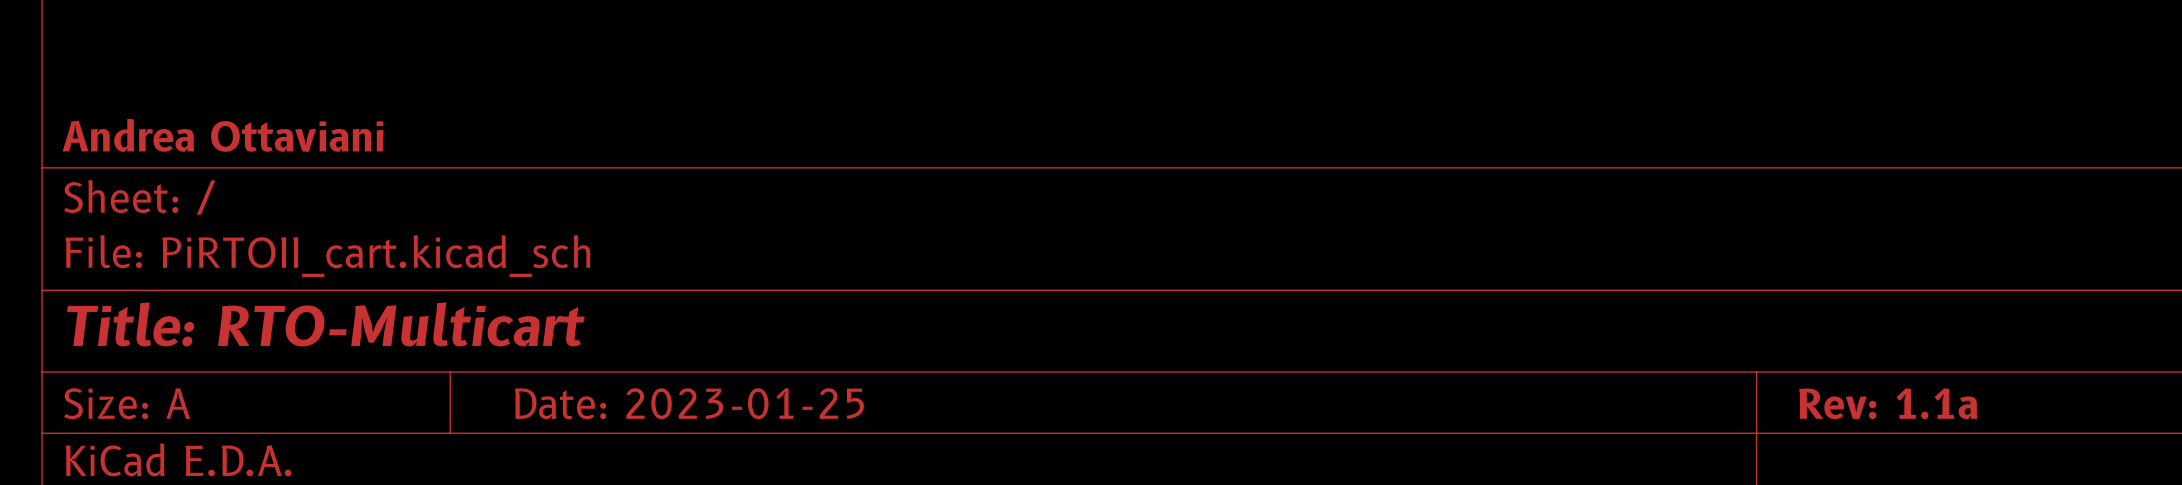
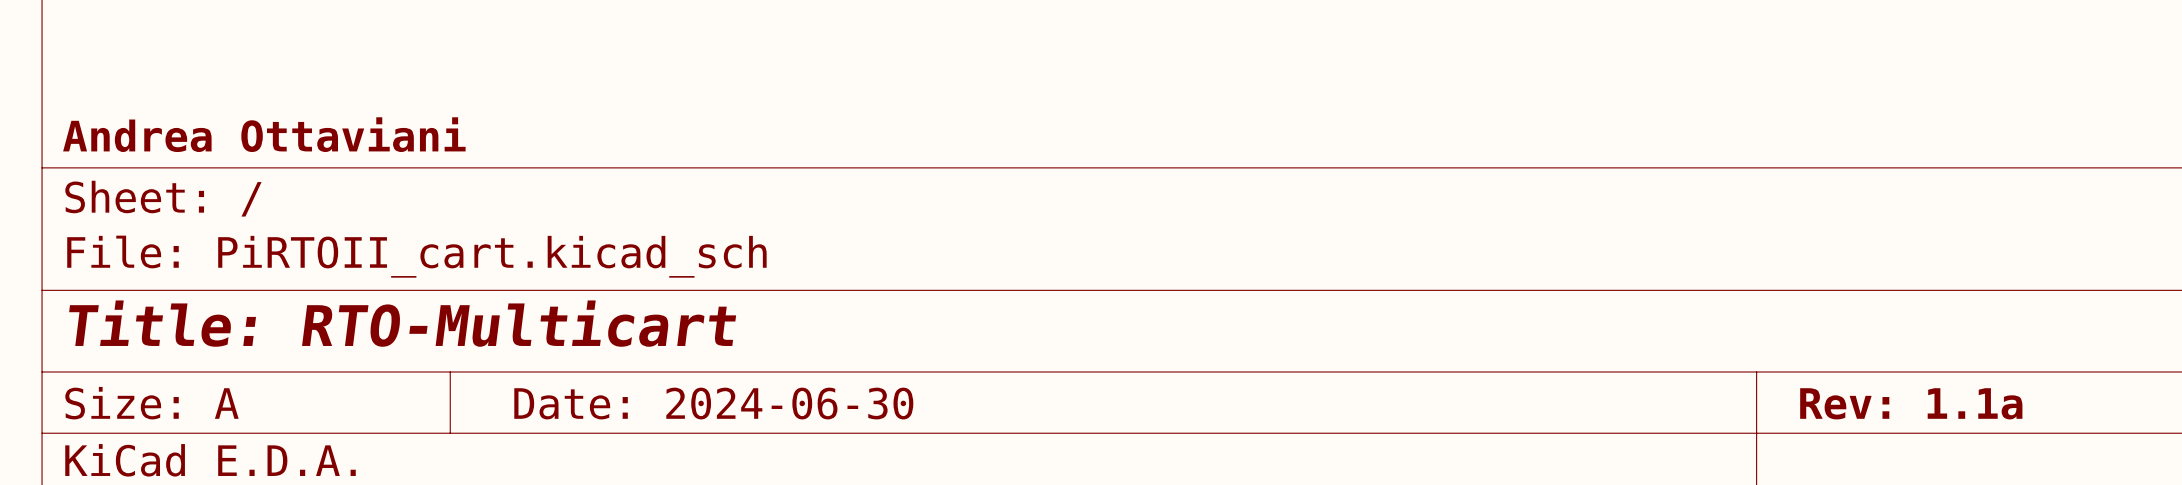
title block: Date: 2023-01-25 (689, 403) -> Date: 2024-06-30 (713, 403)

